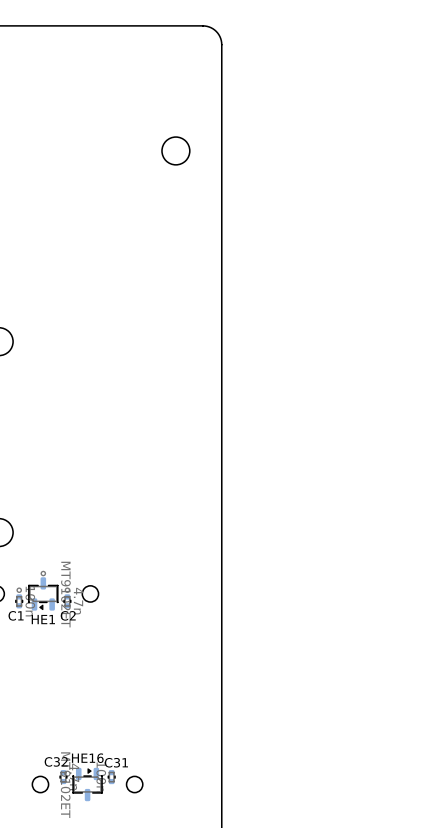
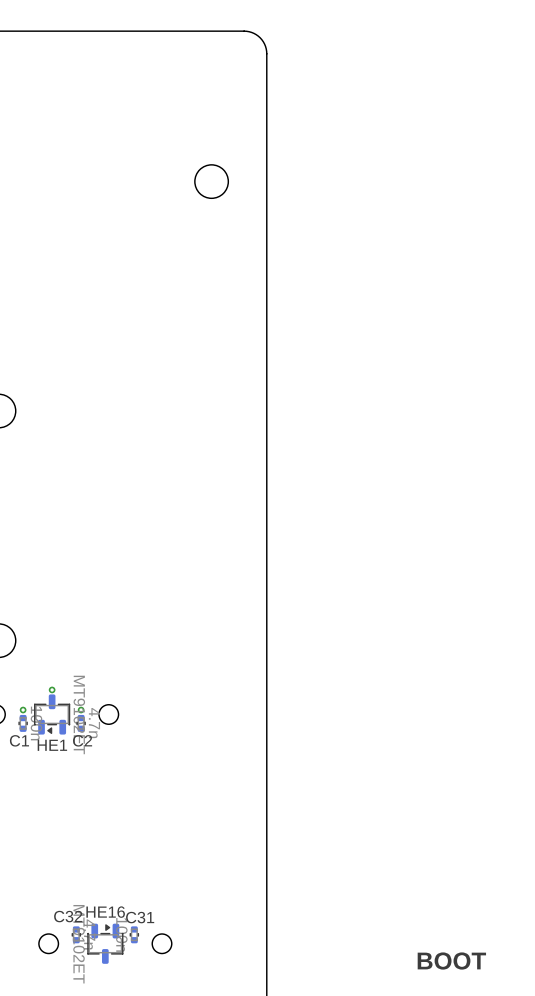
text: none -> BOOT (451, 961)

